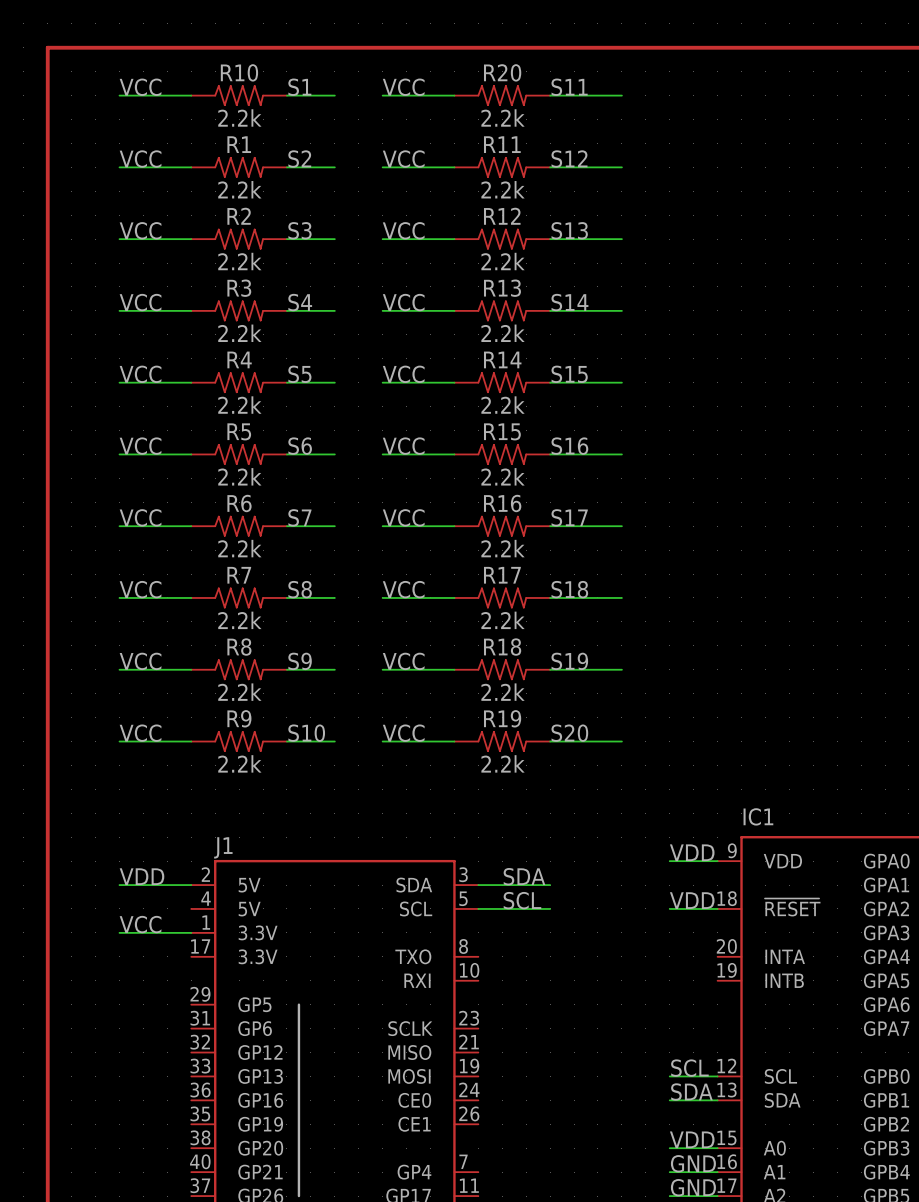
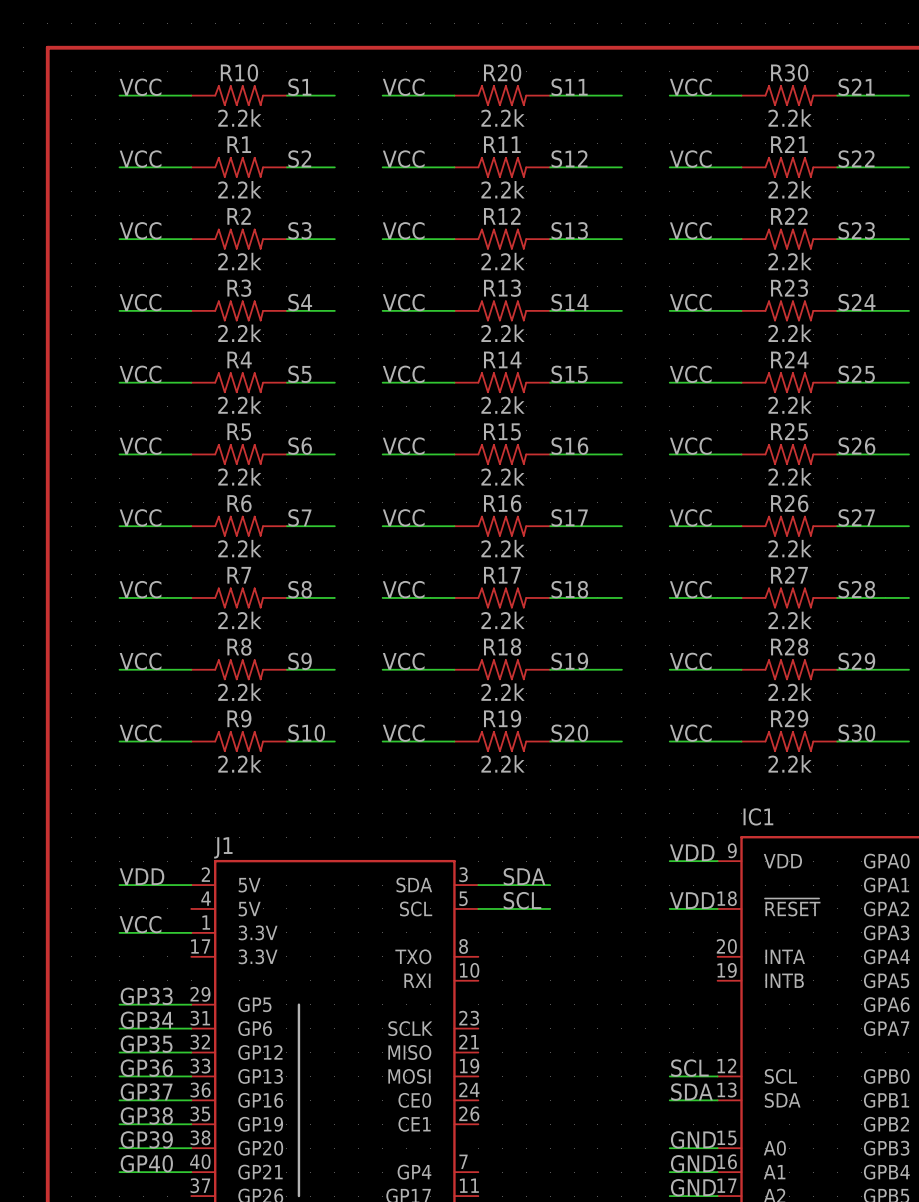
label: none -> VCC (690, 87)
label: none -> S21 (856, 87)
wire: none -> (669, 95) (741, 95)
R30: none -> 2.2k (789, 95)
wire: none -> (837, 95) (908, 95)
label: none -> VCC (690, 159)
label: none -> S22 (856, 159)
wire: none -> (669, 167) (741, 167)
R21: none -> 2.2k (789, 167)
wire: none -> (837, 167) (908, 167)
label: none -> VCC (690, 230)
label: none -> S23 (856, 230)
wire: none -> (669, 239) (741, 239)
R22: none -> 2.2k (789, 239)
wire: none -> (837, 239) (908, 239)
label: none -> VCC (690, 302)
label: none -> S24 (857, 302)
wire: none -> (669, 310) (741, 310)
R23: none -> 2.2k (789, 310)
wire: none -> (837, 310) (908, 310)
label: none -> VCC (690, 374)
label: none -> S25 (856, 374)
wire: none -> (669, 382) (741, 382)
R24: none -> 2.2k (789, 382)
wire: none -> (837, 382) (908, 382)
label: none -> VCC (690, 446)
label: none -> S26 (856, 446)
wire: none -> (669, 454) (741, 454)
R25: none -> 2.2k (789, 454)
wire: none -> (837, 454) (908, 454)
label: none -> VCC (690, 517)
label: none -> S27 (856, 517)
wire: none -> (669, 526) (741, 526)
R26: none -> 2.2k (789, 526)
wire: none -> (837, 526) (908, 526)
label: none -> VCC (690, 589)
label: none -> S28 (856, 589)
wire: none -> (669, 597) (741, 597)
R27: none -> 2.2k (789, 597)
wire: none -> (837, 597) (908, 597)
label: none -> VCC (690, 661)
label: none -> S29 (856, 661)
wire: none -> (669, 669) (741, 669)
R28: none -> 2.2k (789, 669)
wire: none -> (837, 669) (908, 669)
label: none -> VCC (690, 733)
label: none -> S30 (856, 733)
wire: none -> (669, 741) (741, 741)
R29: none -> 2.2k (789, 741)
wire: none -> (837, 741) (908, 741)
label: none -> GP33 (146, 996)
wire: none -> (119, 1004) (191, 1004)
label: none -> GP34 (146, 1020)
wire: none -> (119, 1028) (191, 1028)
label: none -> GP35 (146, 1044)
wire: none -> (119, 1052) (191, 1052)
label: none -> GP36 (146, 1068)
wire: none -> (119, 1076) (191, 1076)
label: none -> GP37 (146, 1092)
wire: none -> (119, 1100) (191, 1100)
label: none -> GP38 (146, 1115)
wire: none -> (119, 1124) (191, 1124)
label: none -> GP39 (146, 1139)
label: VDD (692, 1139) -> GND (693, 1139)
wire: none -> (119, 1148) (191, 1148)
label: none -> GP40 (146, 1163)
wire: none -> (119, 1172) (191, 1172)

